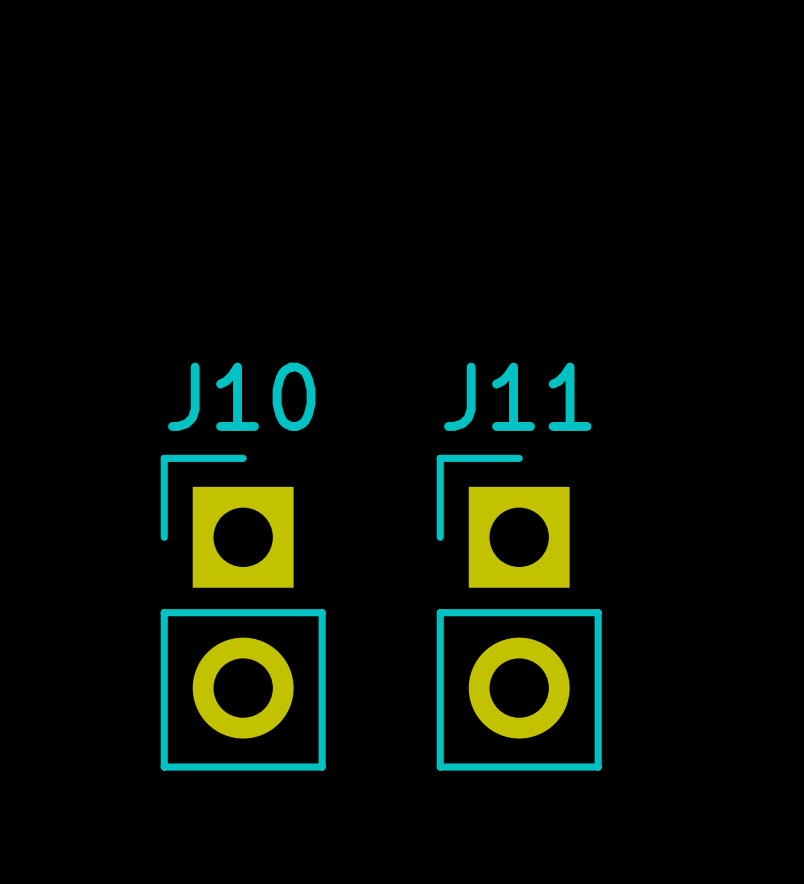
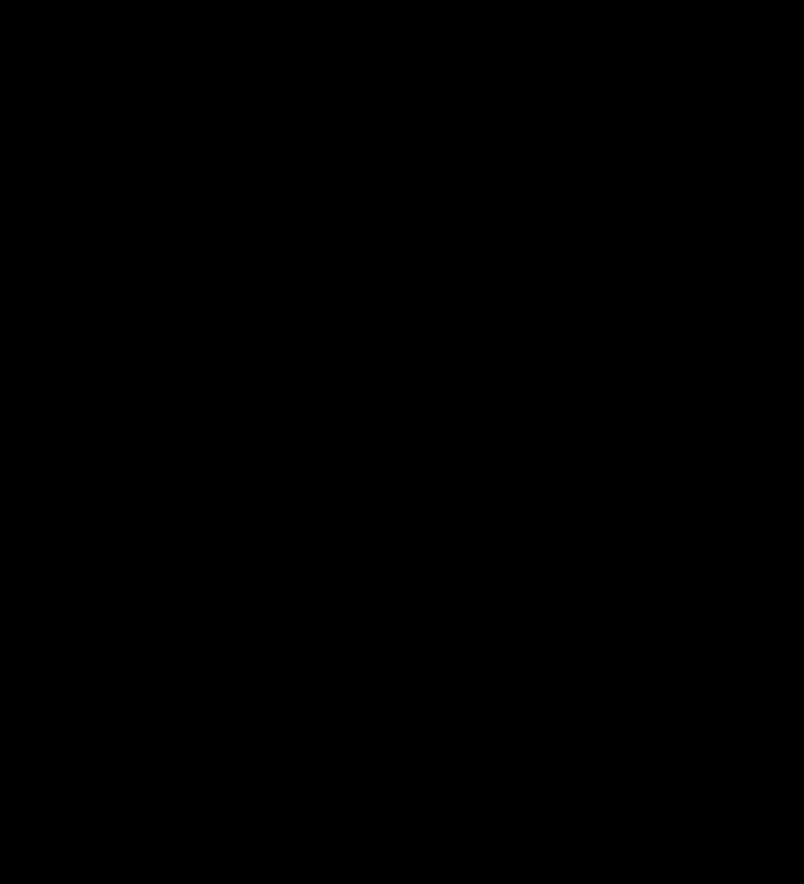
J10: (243, 612) -> none
J11: (519, 612) -> none

